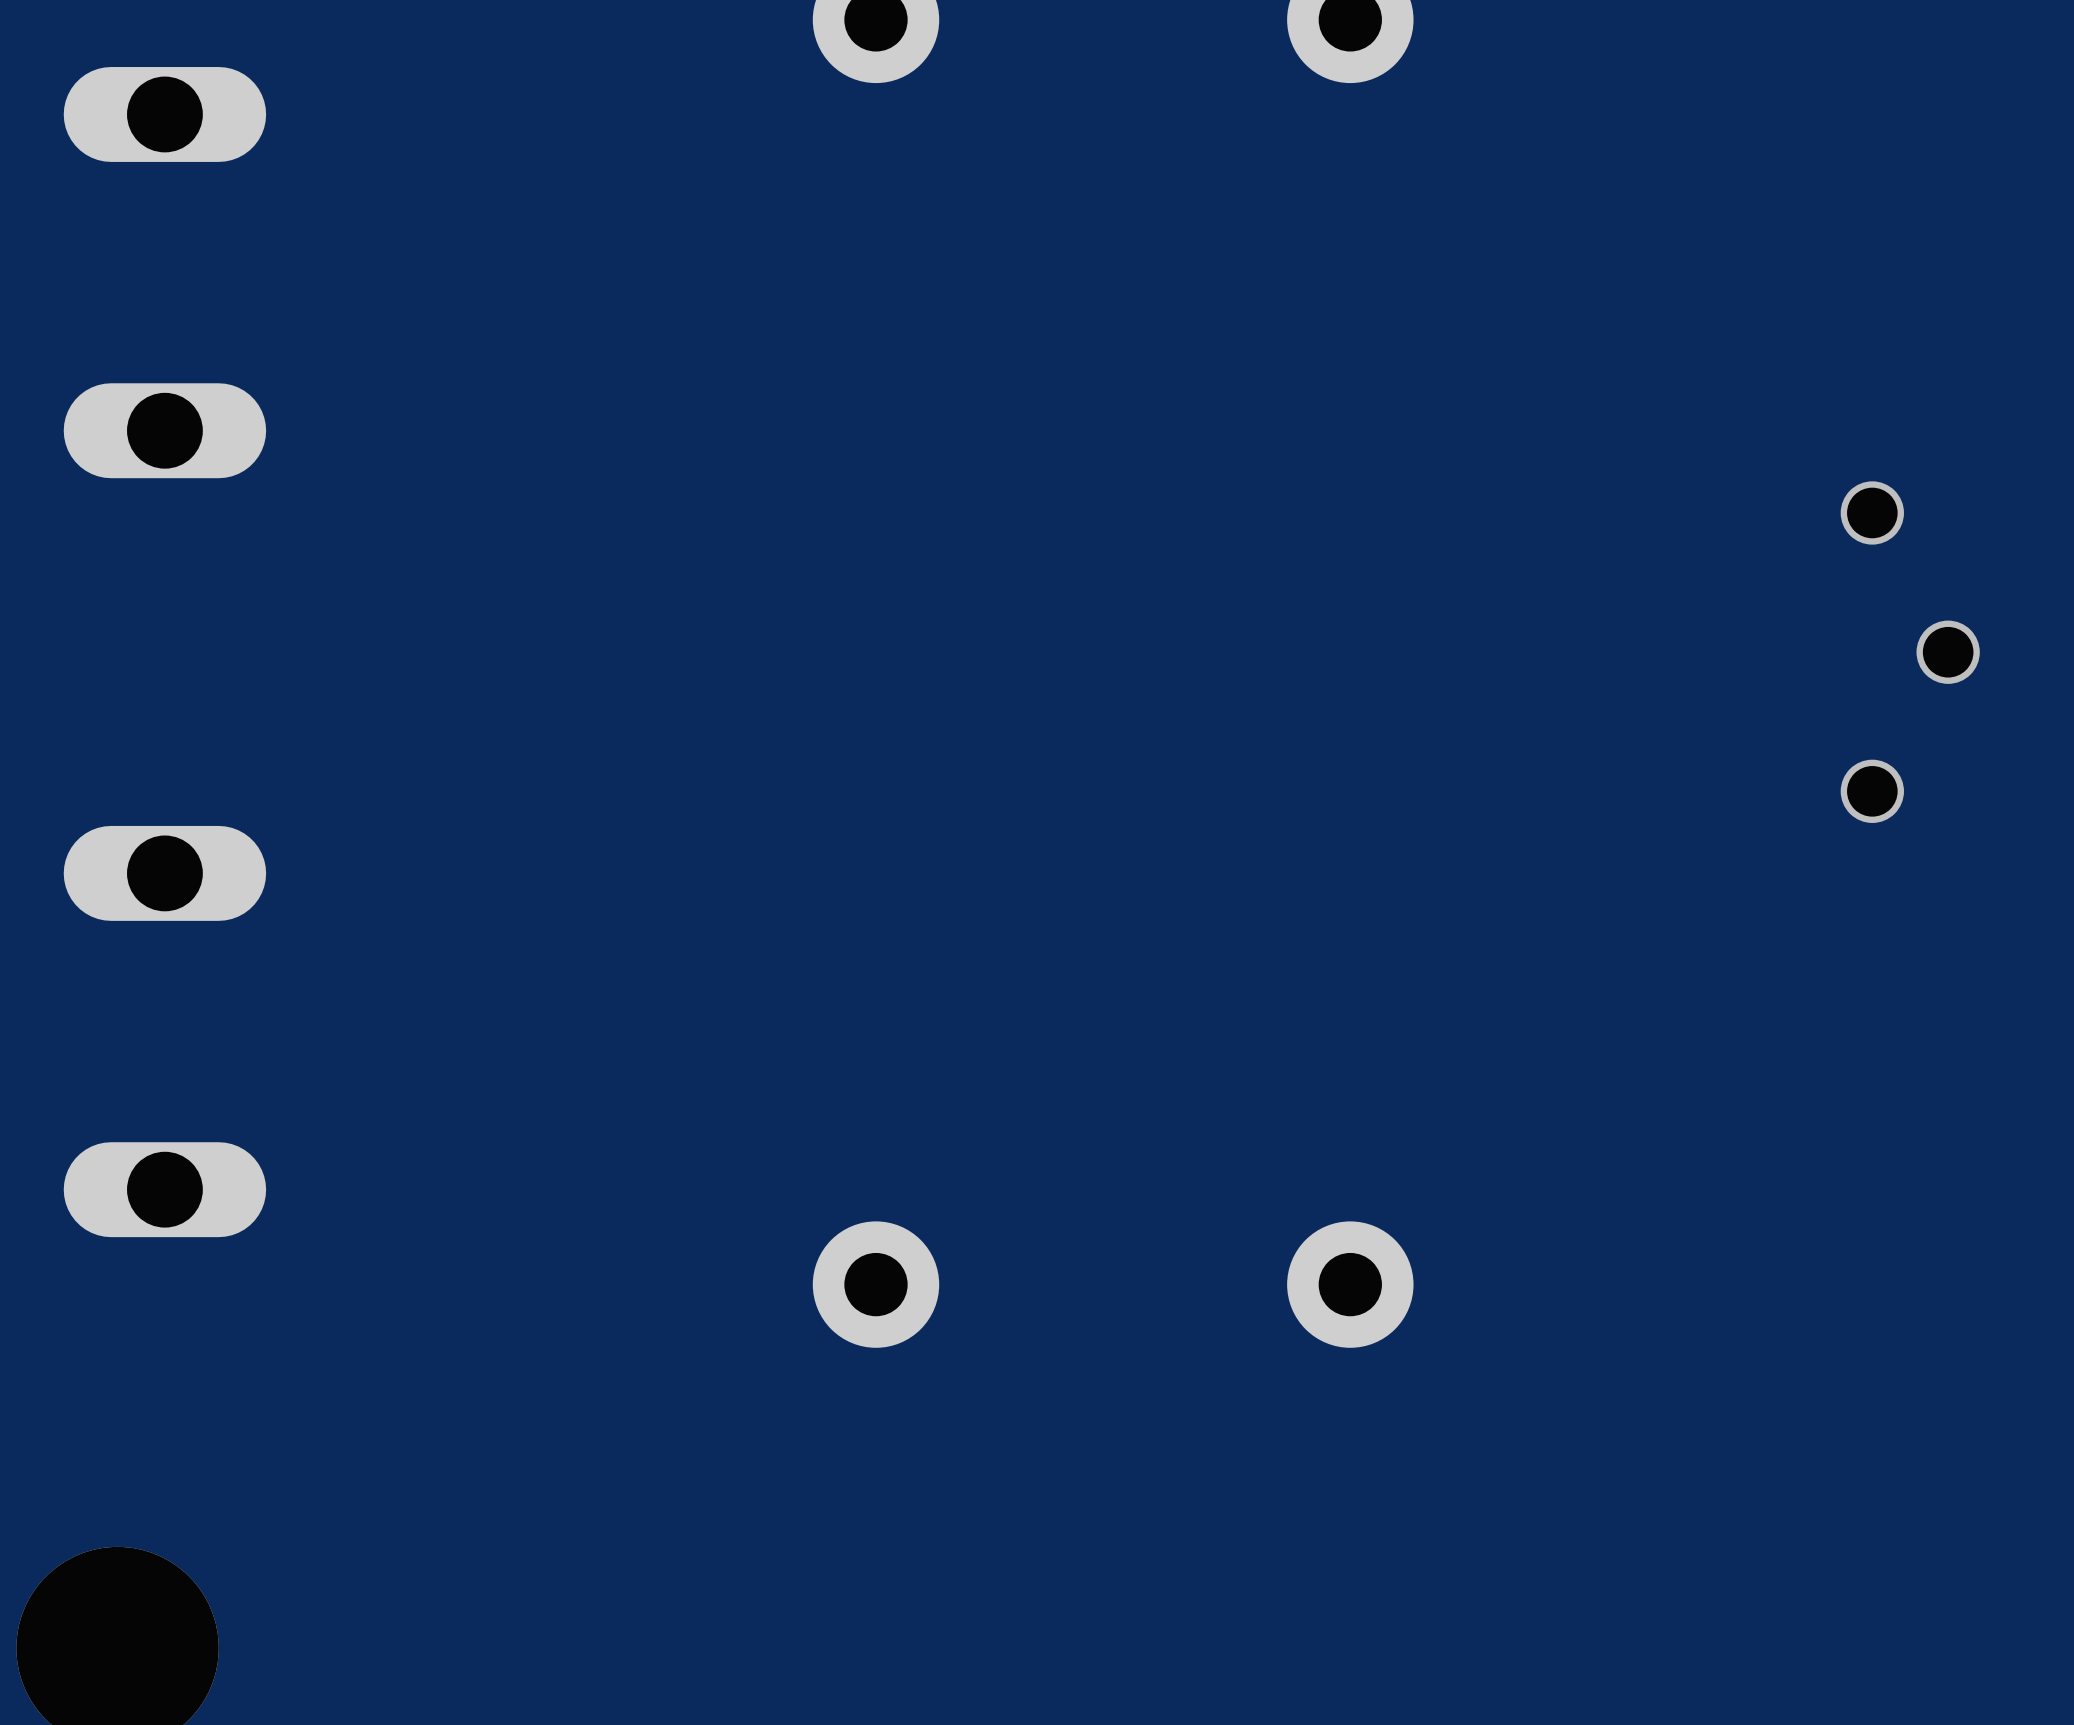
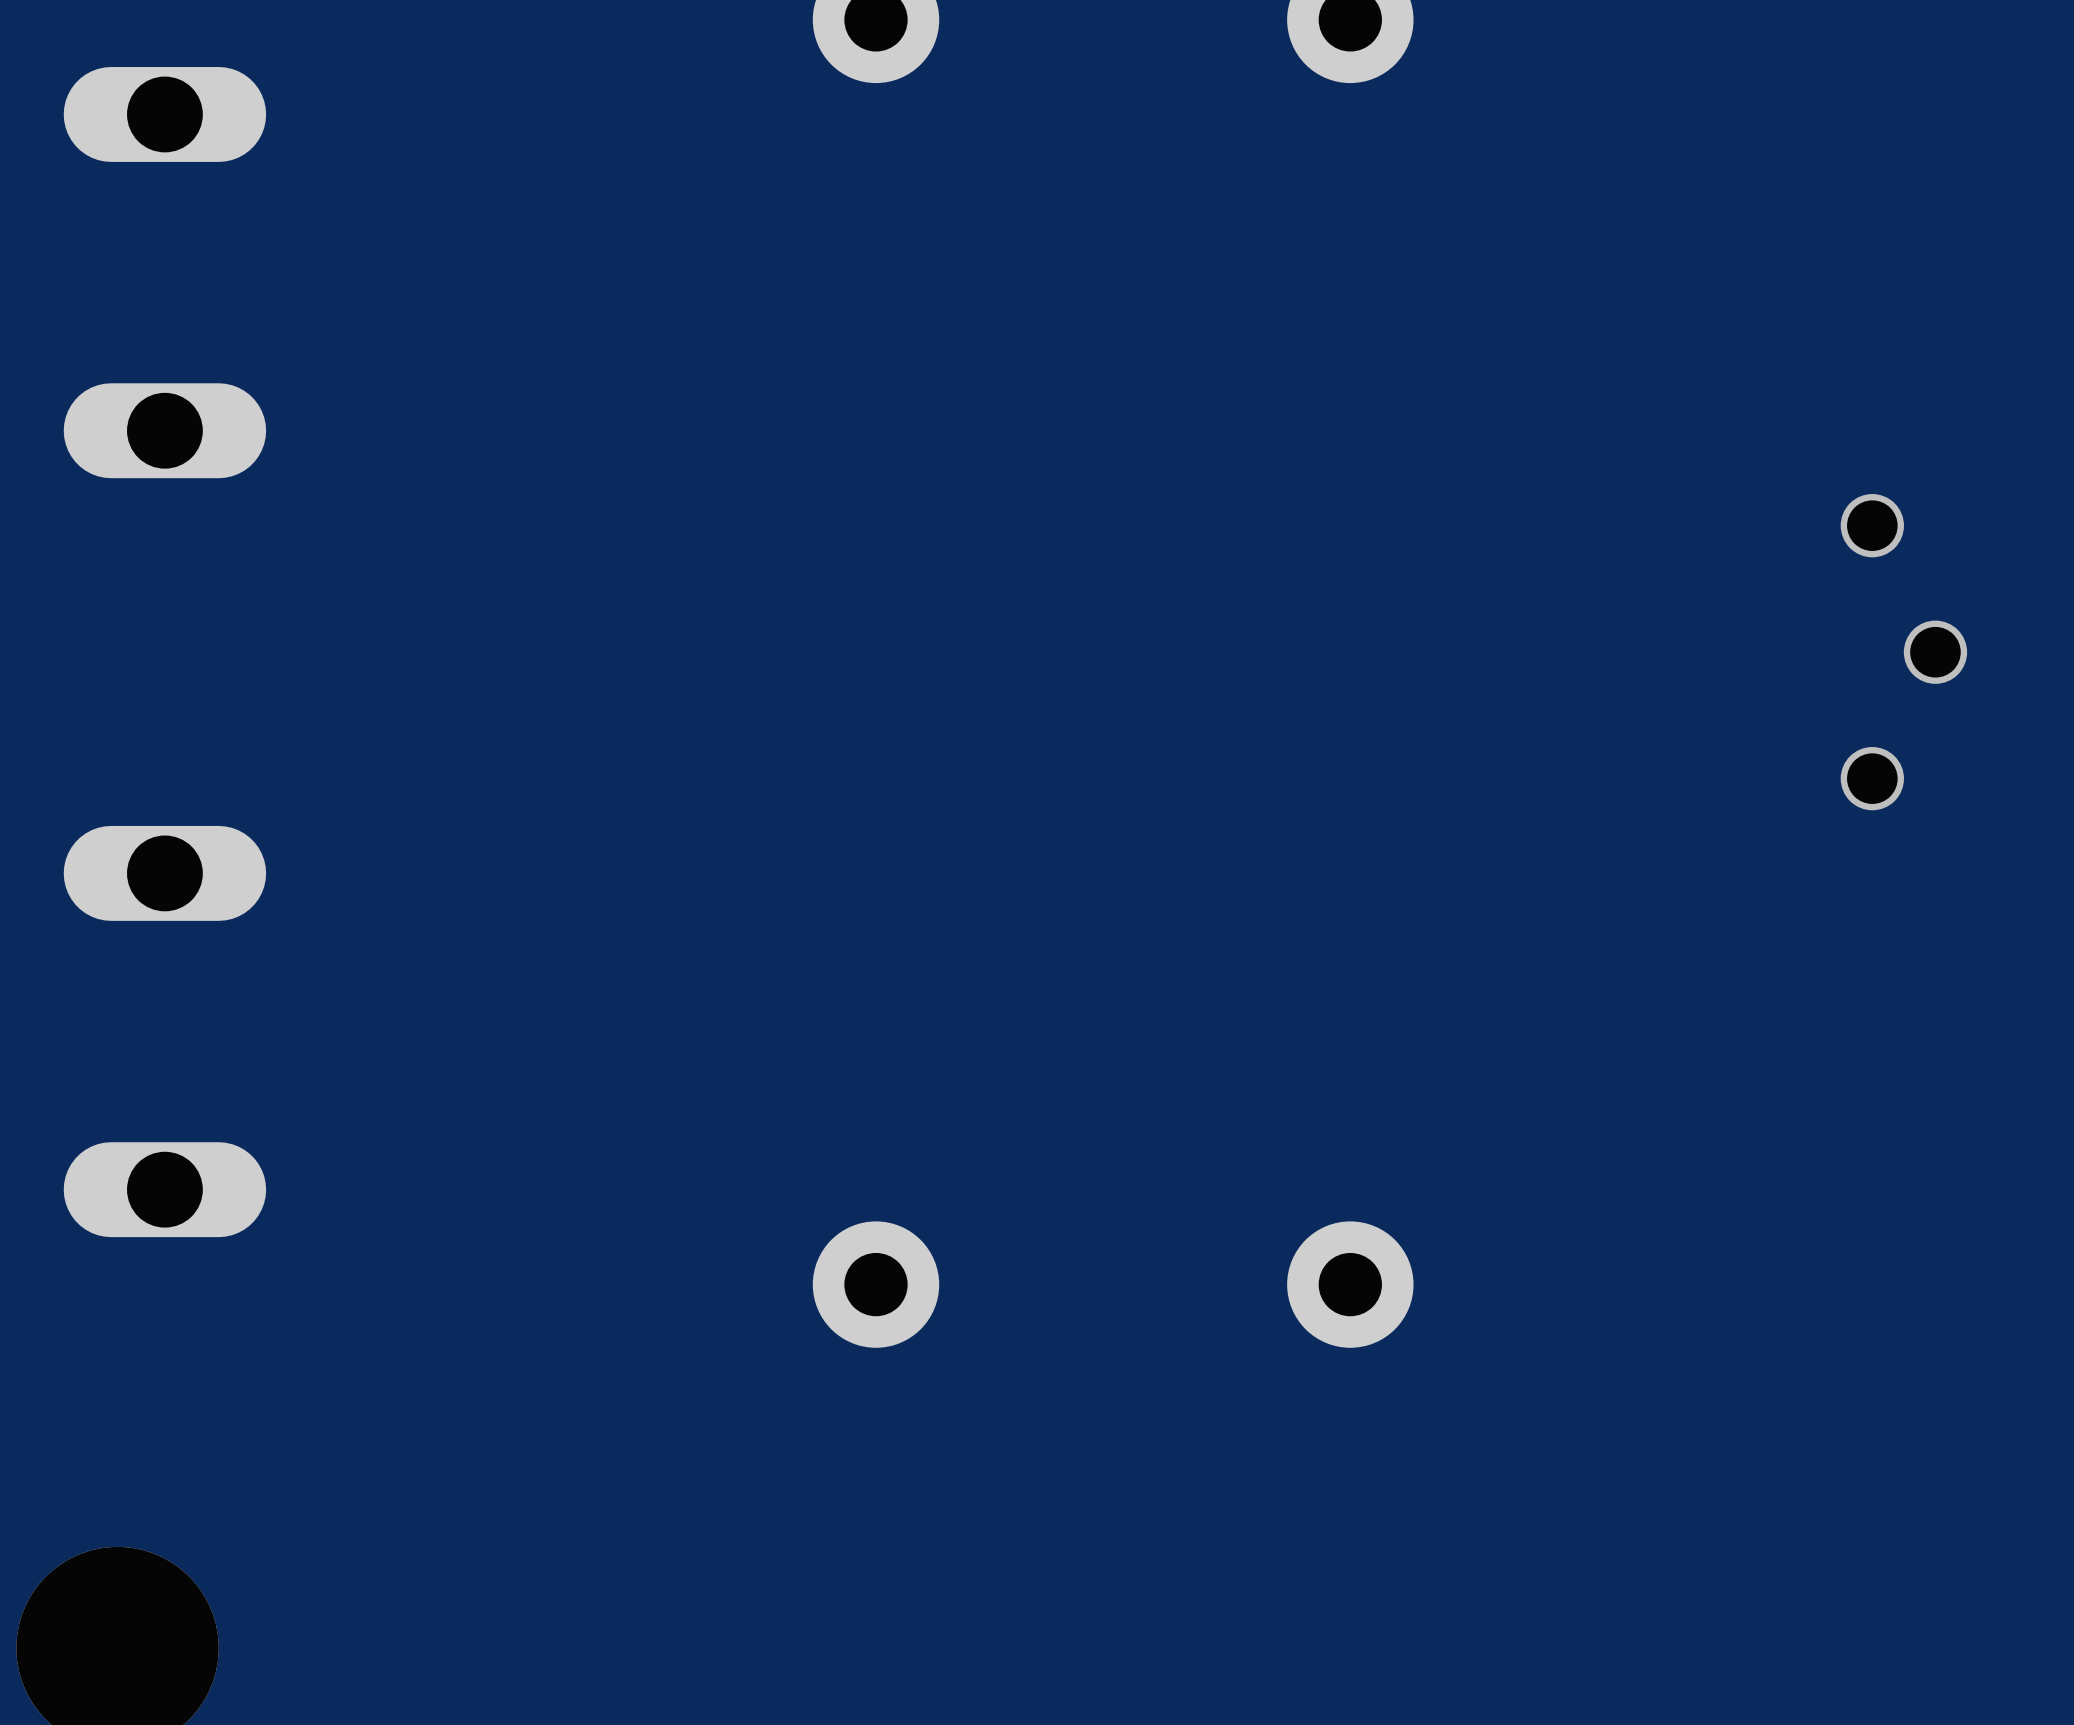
via position: (1872, 512) -> (1872, 525)
via position: (1948, 652) -> (1935, 652)
via position: (1872, 791) -> (1872, 778)

